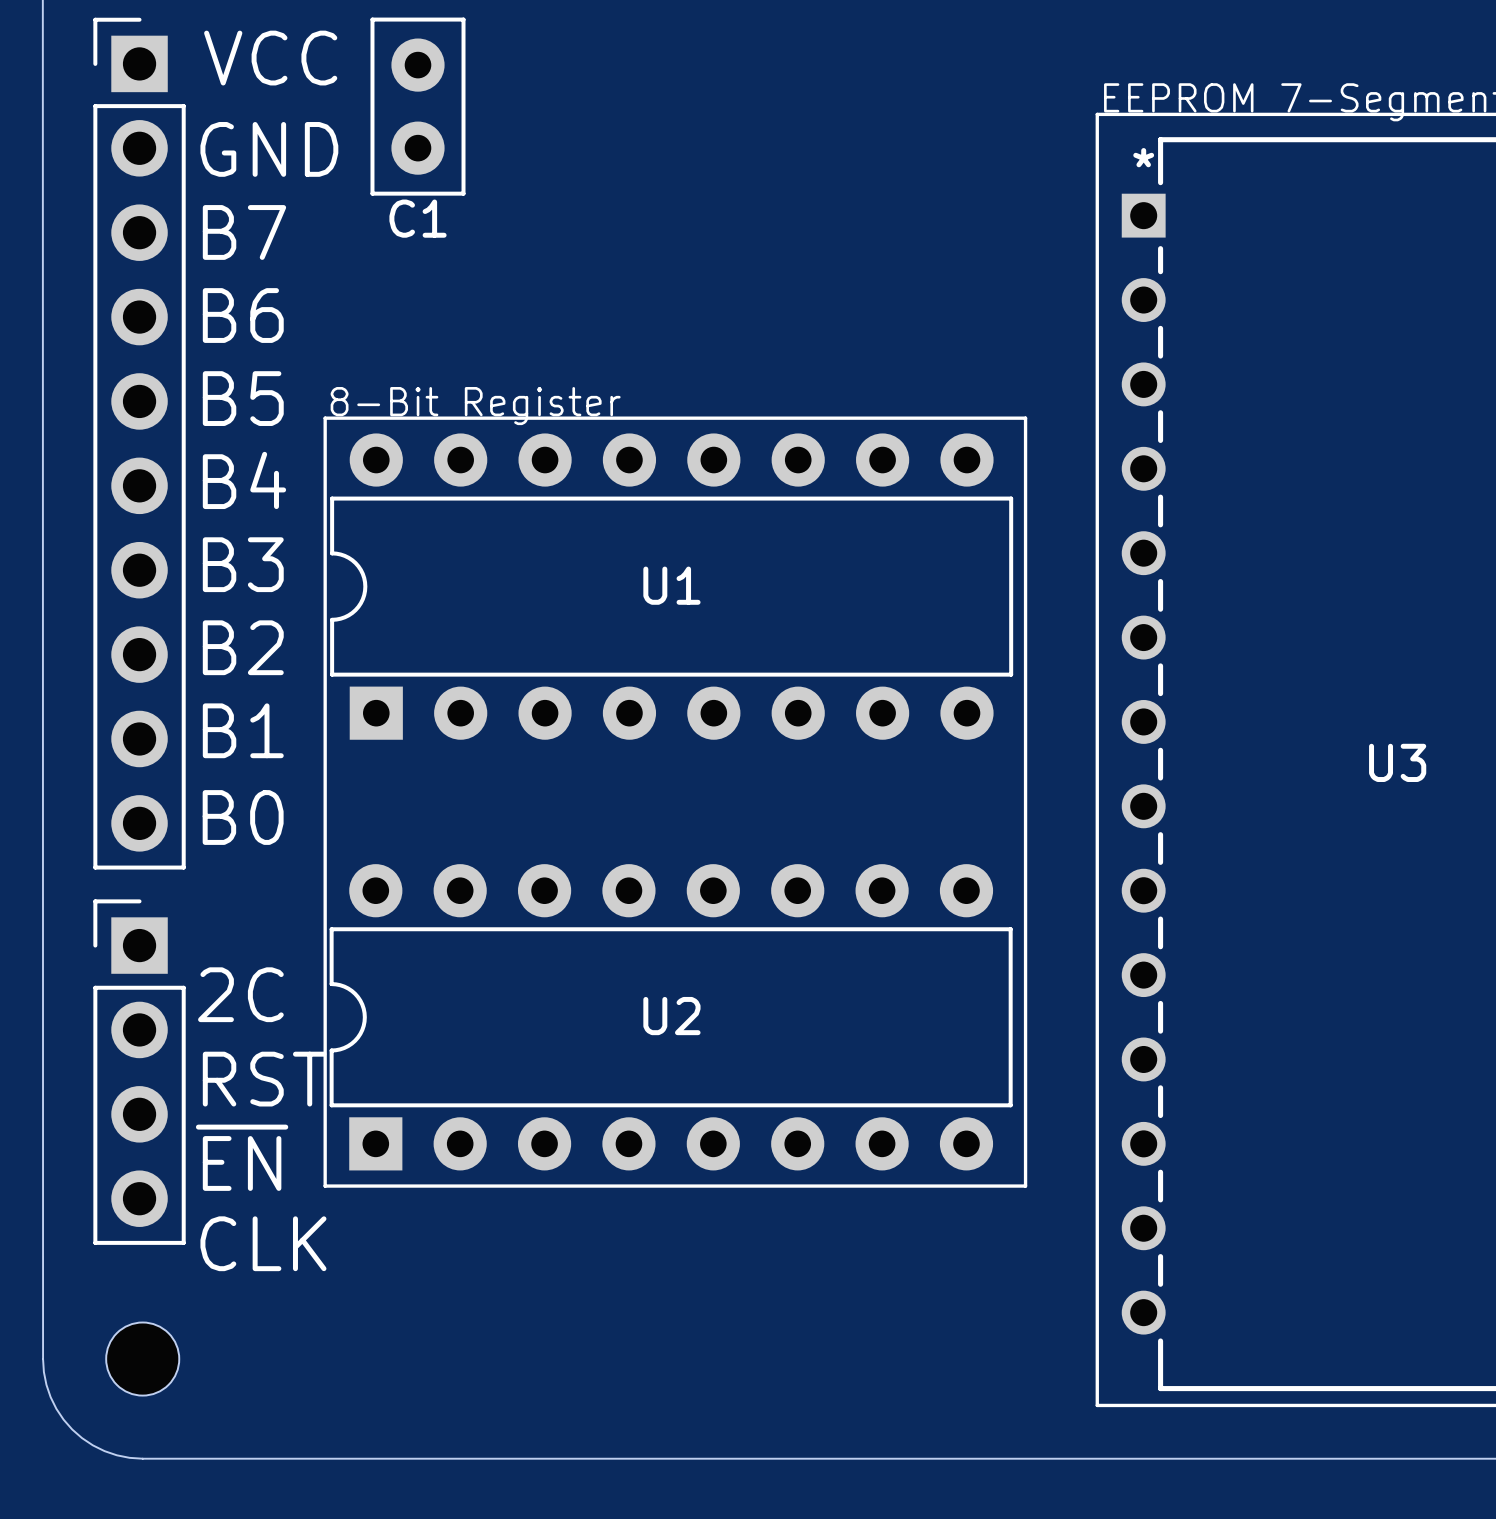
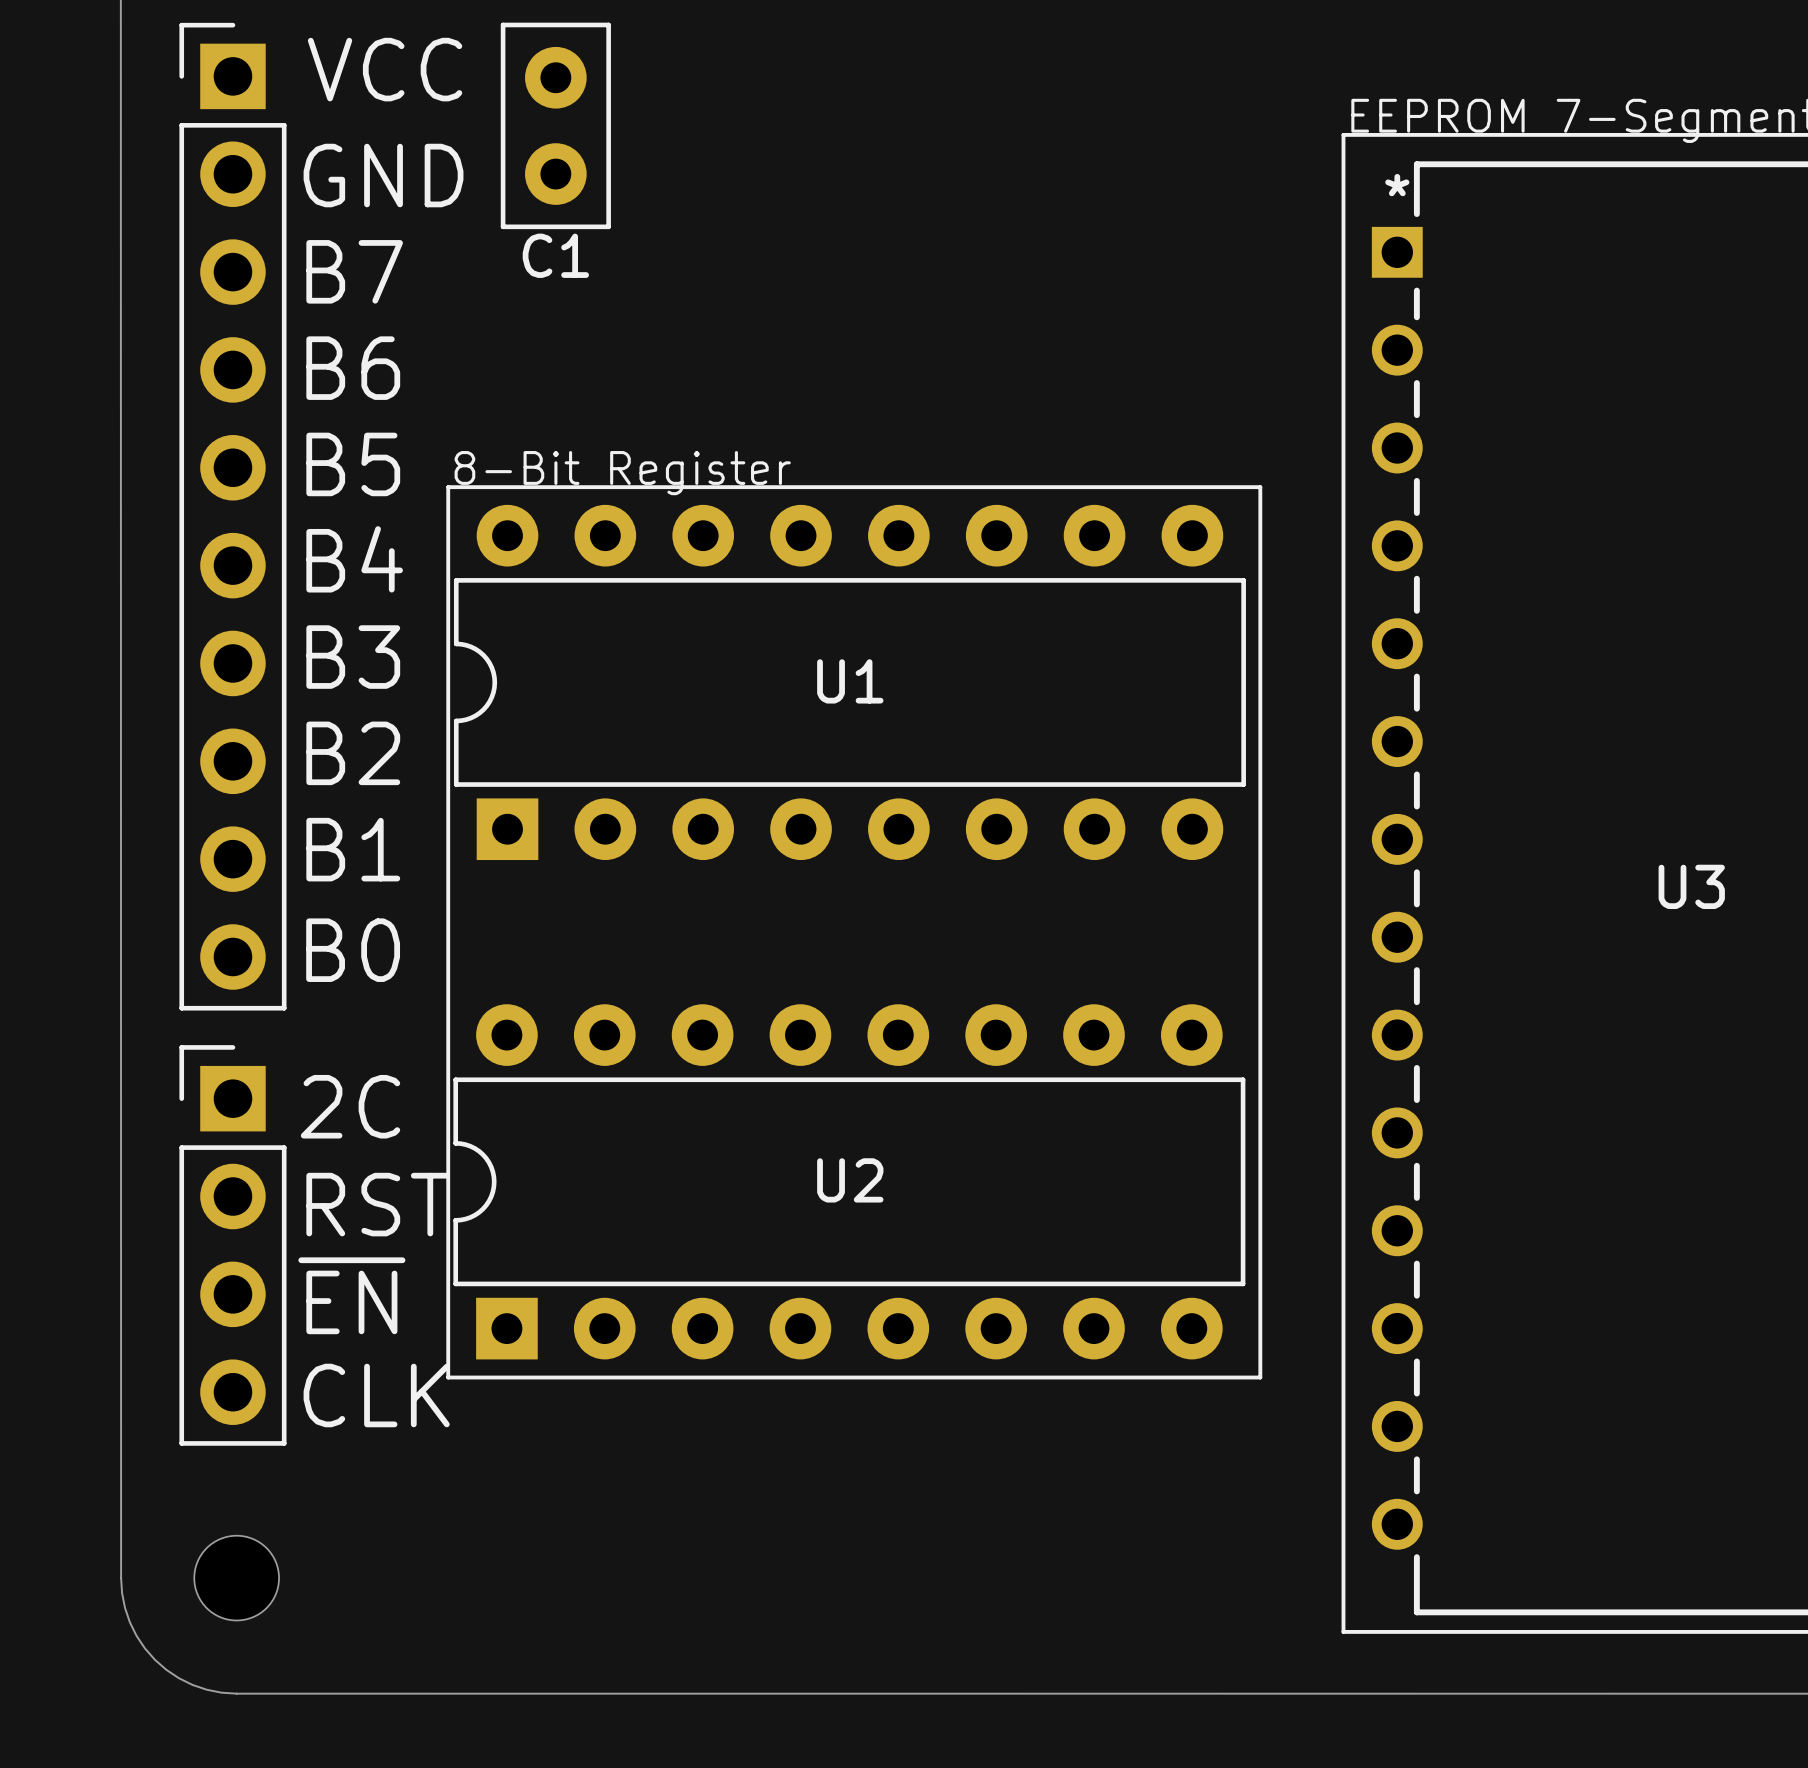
text position: 2C (240, 994) -> 2C (350, 1106)
text position: RST (264, 1079) -> RST (378, 1204)
text position: ~{EN} (242, 1157) -> ~{EN} (351, 1295)
text position: CLK (263, 1243) -> CLK (376, 1395)

